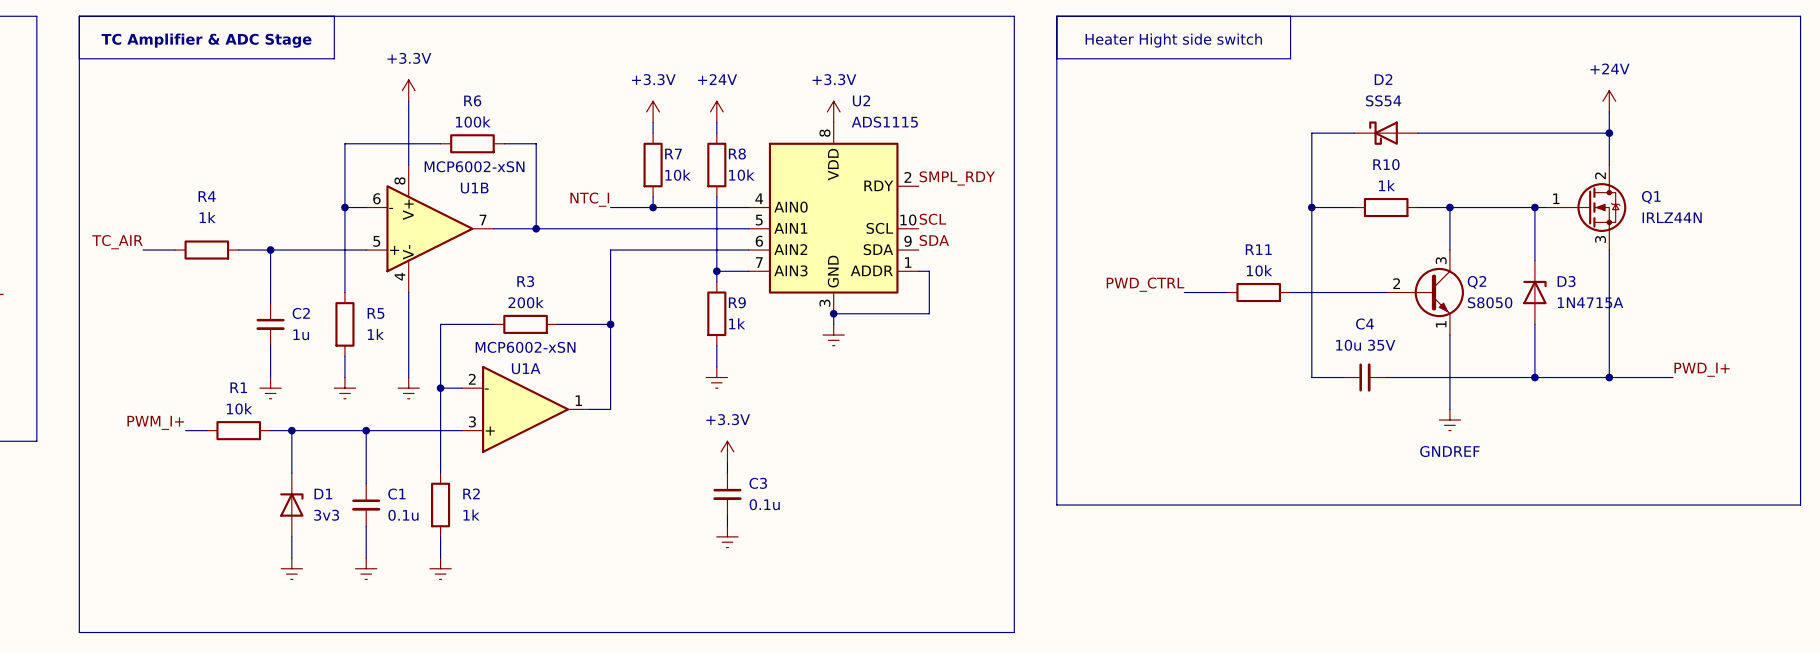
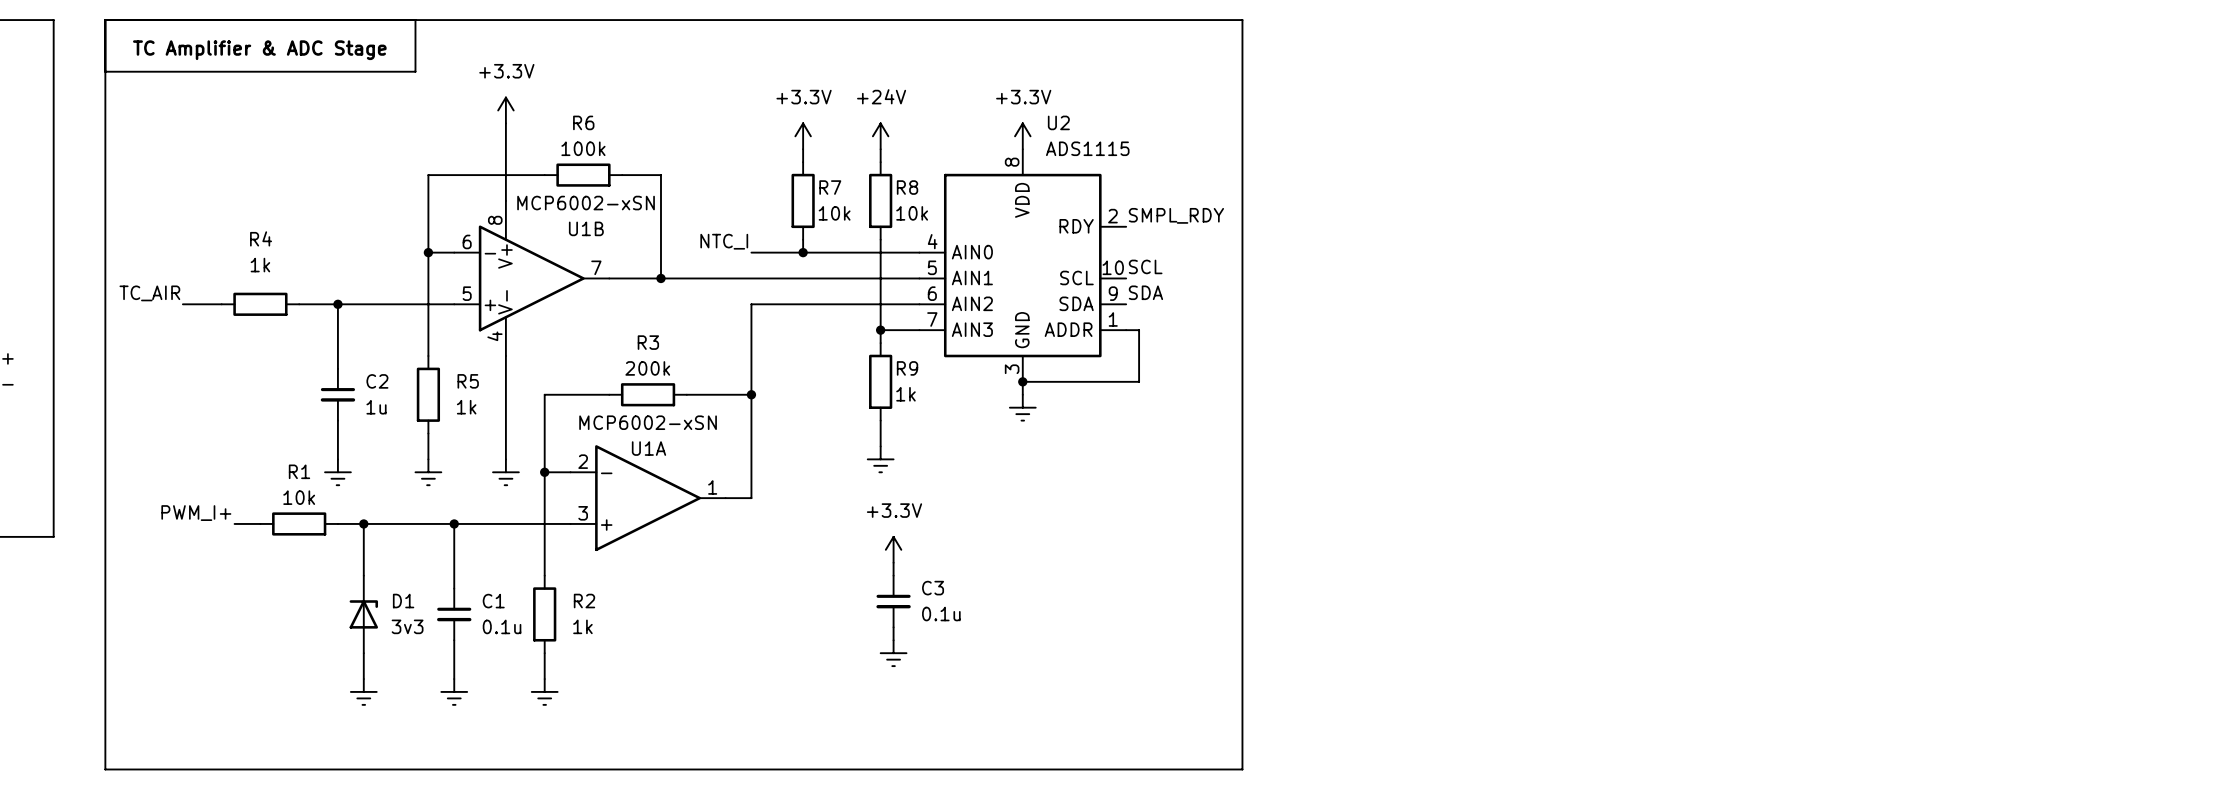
line: (1056, 16) (1800, 16) (1800, 505) (1056, 505) (1056, 16) -> none
line: (1290, 16) (1290, 58) (1056, 58) -> none
text: Heater Hight side switch (1173, 40) -> none
power symbol: +24V (1609, 101) -> none
wire: (1609, 111) (1609, 165) -> none
wire: (1354, 133) (1311, 133) (1311, 377) (1343, 377) -> none
D2: SS54 (1386, 133) -> none
wire: (1418, 133) (1609, 133) -> none
junction: (1609, 133) -> none
wire: (1311, 207) (1354, 207) -> none
junction: (1311, 207) -> none
R10: 1k (1386, 207) -> none
wire: (1418, 207) (1545, 207) -> none
wire: (1449, 207) (1449, 250) -> none
junction: (1449, 207) -> none
wire: (1534, 207) (1534, 260) -> none
junction: (1534, 207) -> none
Q1: IRLZ44N (1585, 207) -> none
wire: (1609, 250) (1609, 377) -> none
label: PWD_CTRL (1145, 284) -> none
wire: (1184, 292) (1226, 292) -> none
R11: 10k (1258, 292) -> none
wire: (1290, 292) (1386, 292) -> none
Q2: S8050 (1425, 292) -> none
D3: 1N4715A (1534, 292) -> none
wire: (1534, 324) (1534, 377) -> none
wire: (1449, 335) (1449, 409) -> none
label: PWD_I+ (1702, 369) -> none
C4: 10u 35V (1364, 377) -> none
wire: (1386, 377) (1673, 377) -> none
junction: (1534, 377) -> none
junction: (1609, 377) -> none
power symbol: GNDREF (1449, 420) -> none

